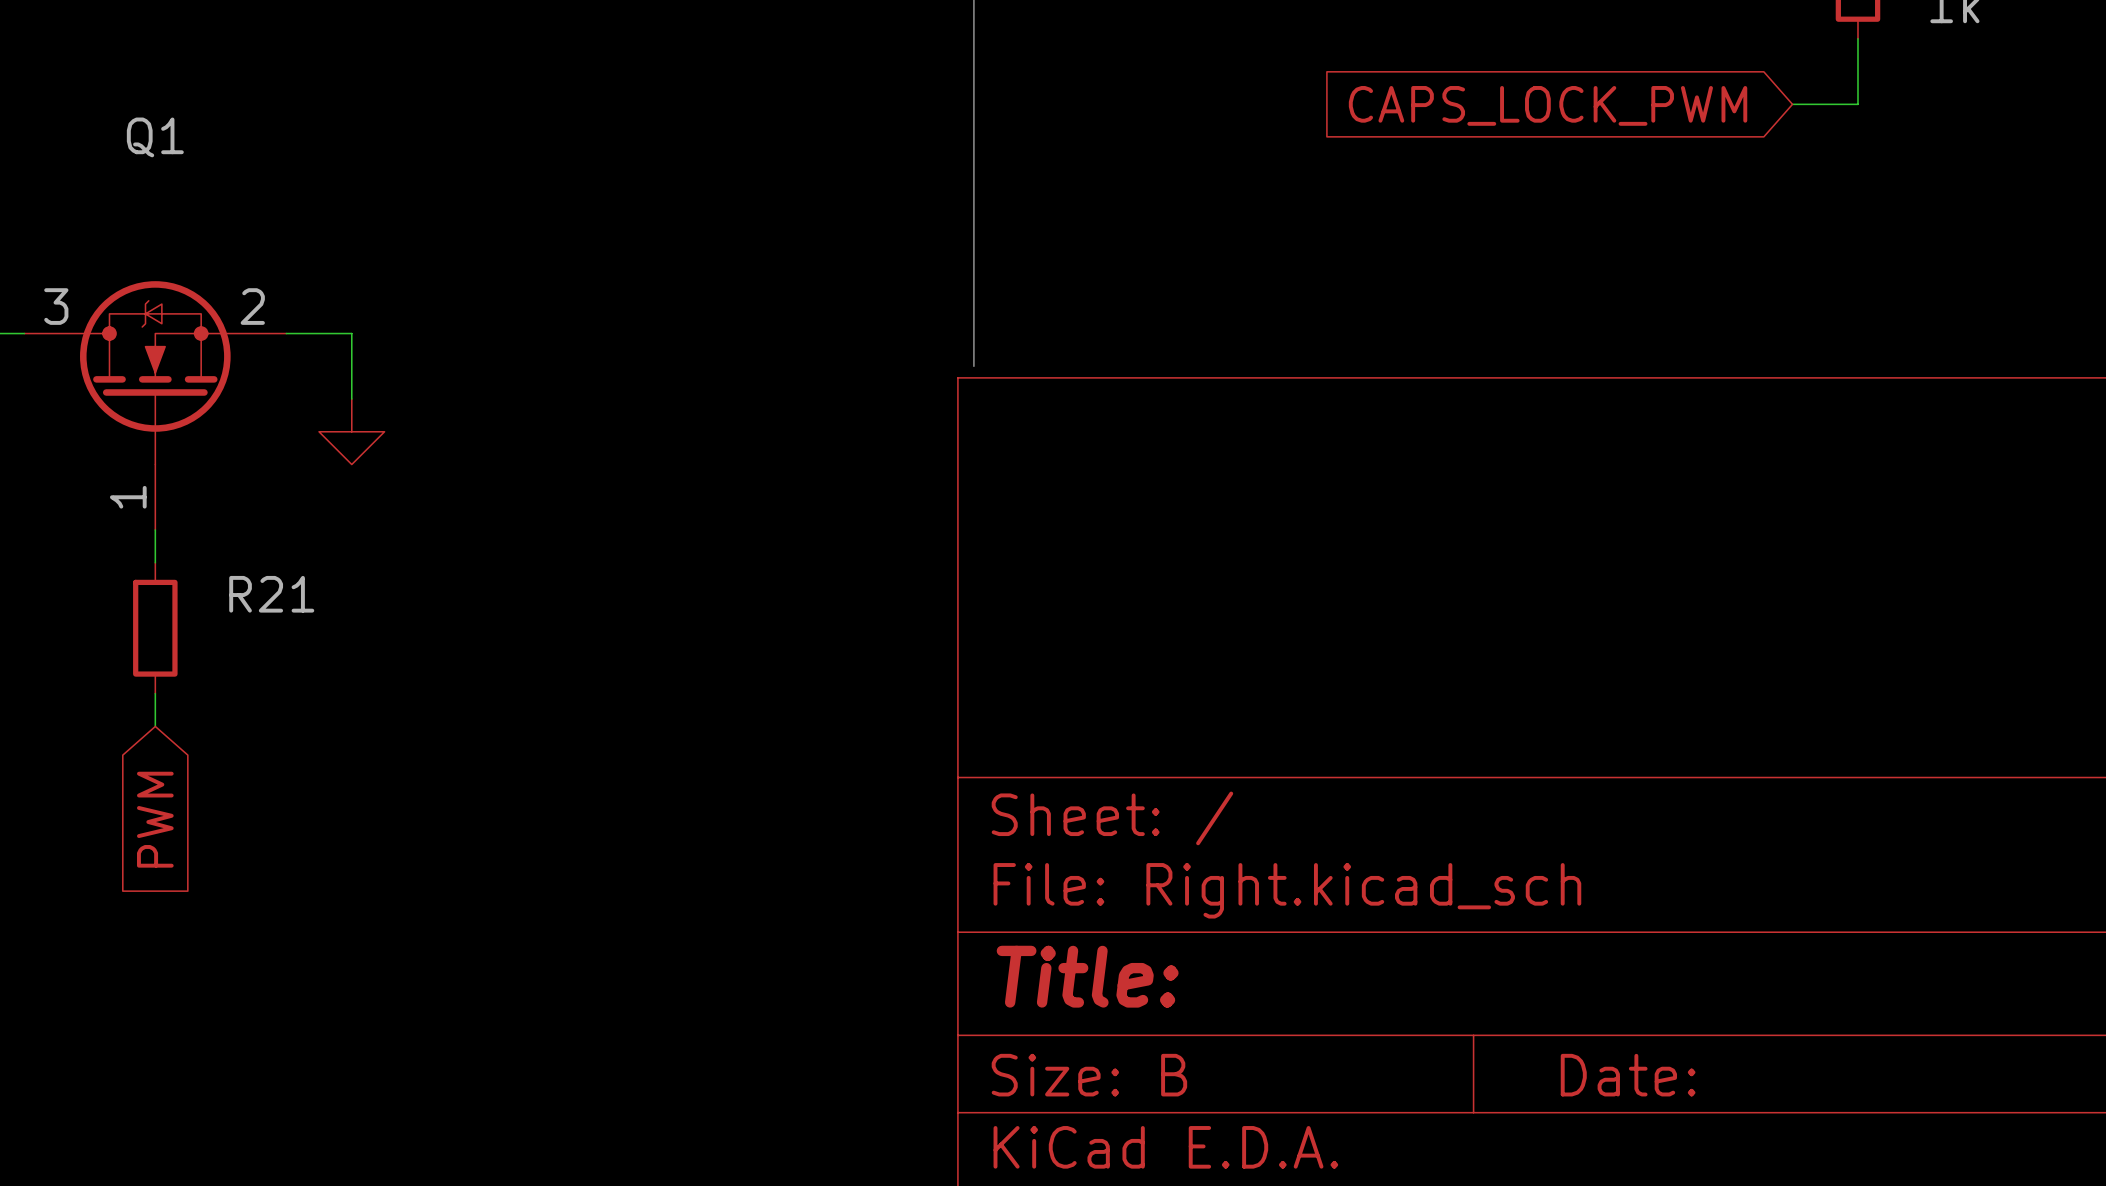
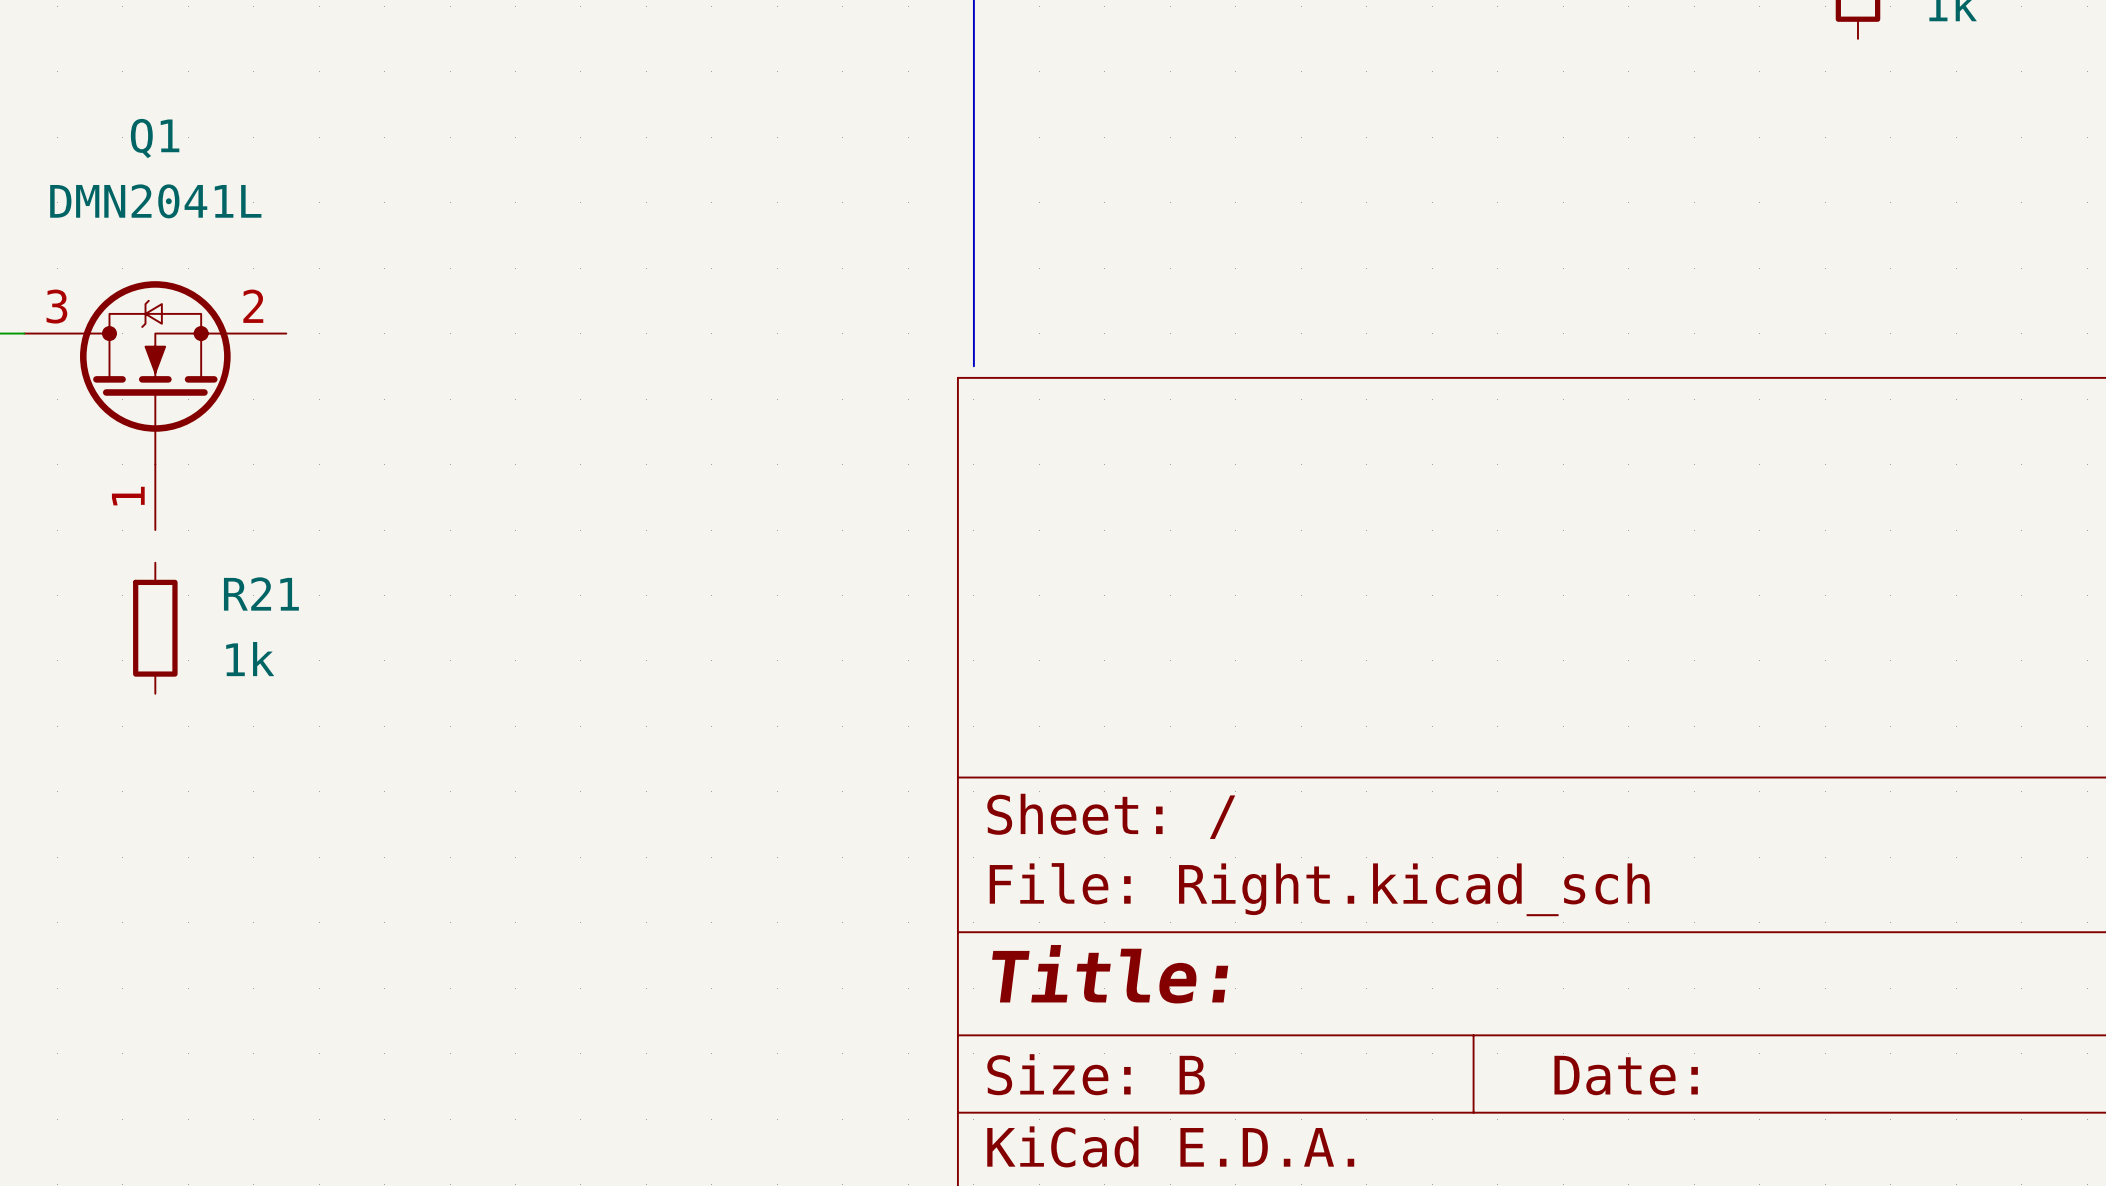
wire: (1857, 38) (1857, 104) (1792, 104) -> none
global label: CAPS_LOCK_PWM (1548, 105) -> none
Q1 value: none -> DMN2041L (155, 201)
wire: (286, 333) (351, 333) (351, 399) -> none
power symbol: (351, 431) -> none
wire: (155, 530) (155, 562) -> none
R21 value: none -> 1k (250, 659)
wire: (155, 693) (155, 726) -> none
global label: PWM (155, 819) -> none

